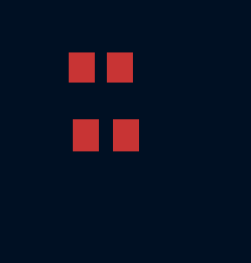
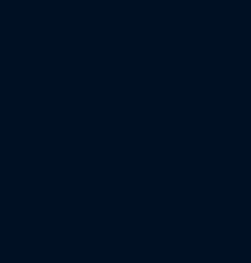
part: (100, 67) -> none
part: (105, 135) -> none

